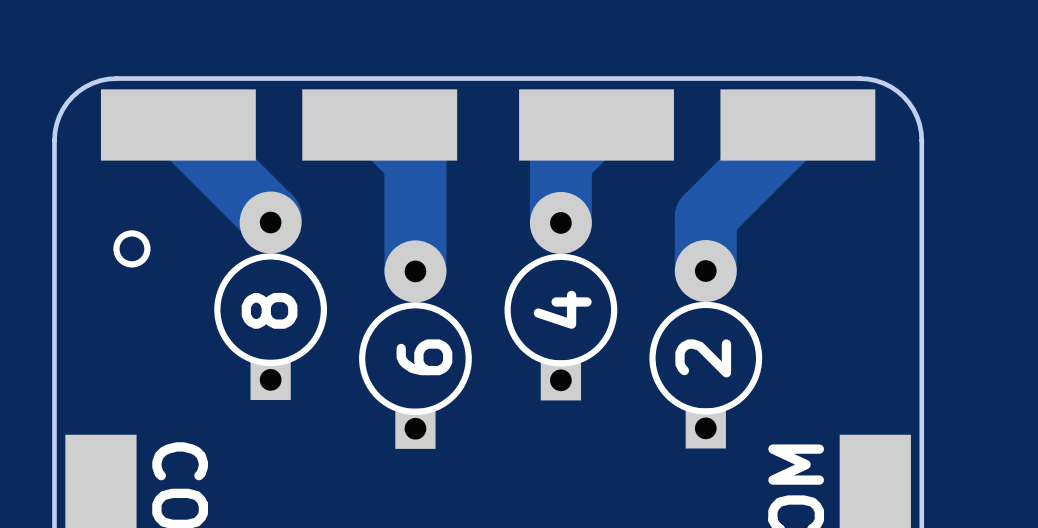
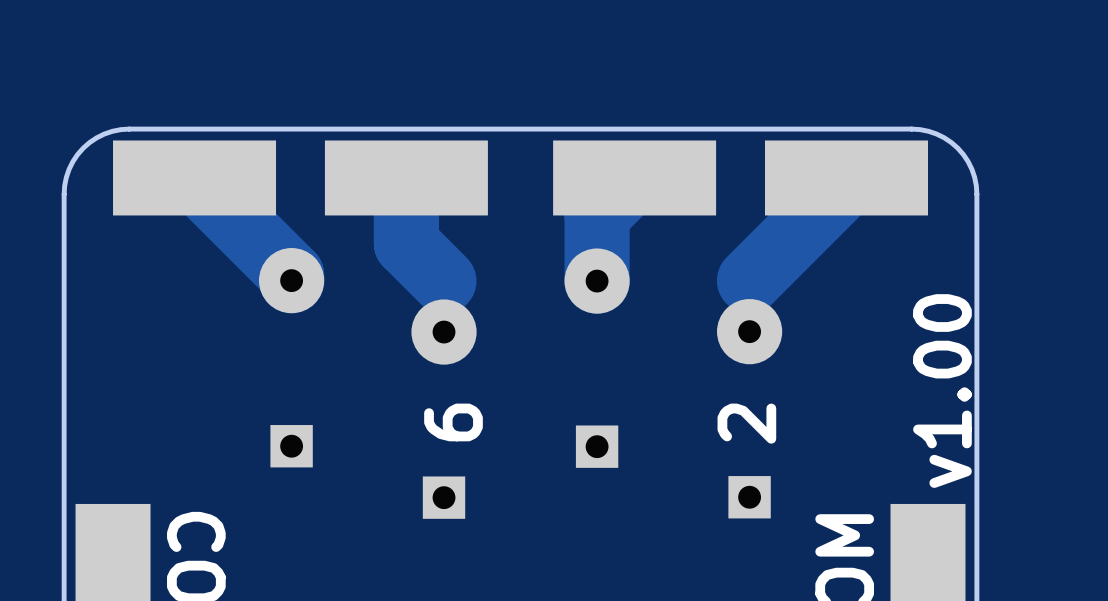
track: (379, 125) (415, 160) (415, 271) -> (406, 177) (406, 243) (443, 281)
track: (797, 125) (705, 217) (705, 271) -> (846, 177) (846, 183) (749, 280)
drawing: [113, 230, 151, 268] -> none
drawing: [214, 253, 763, 415] -> none
text: 4 (562, 309) -> none
text: 8 (269, 310) -> none
text: none -> v1.00 (942, 391)

